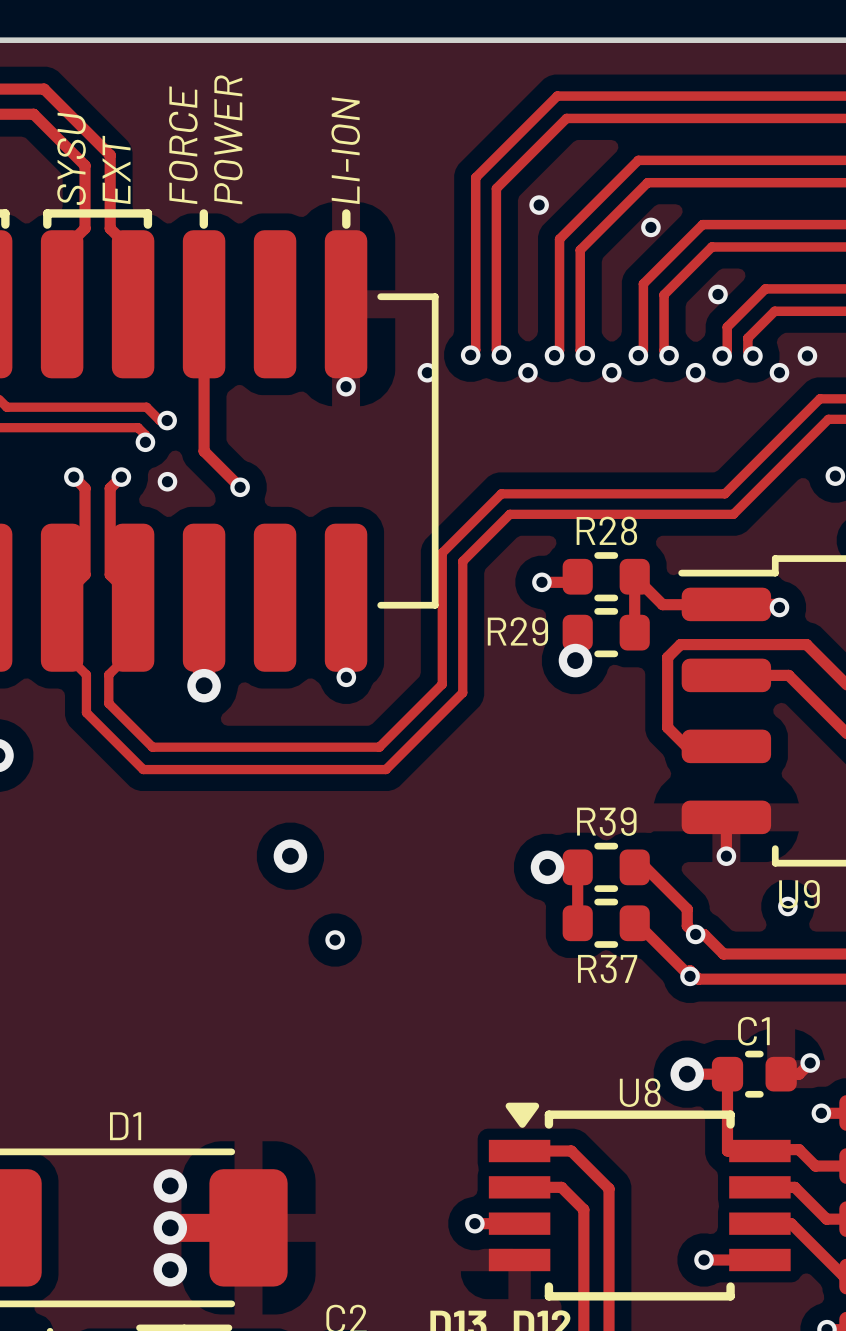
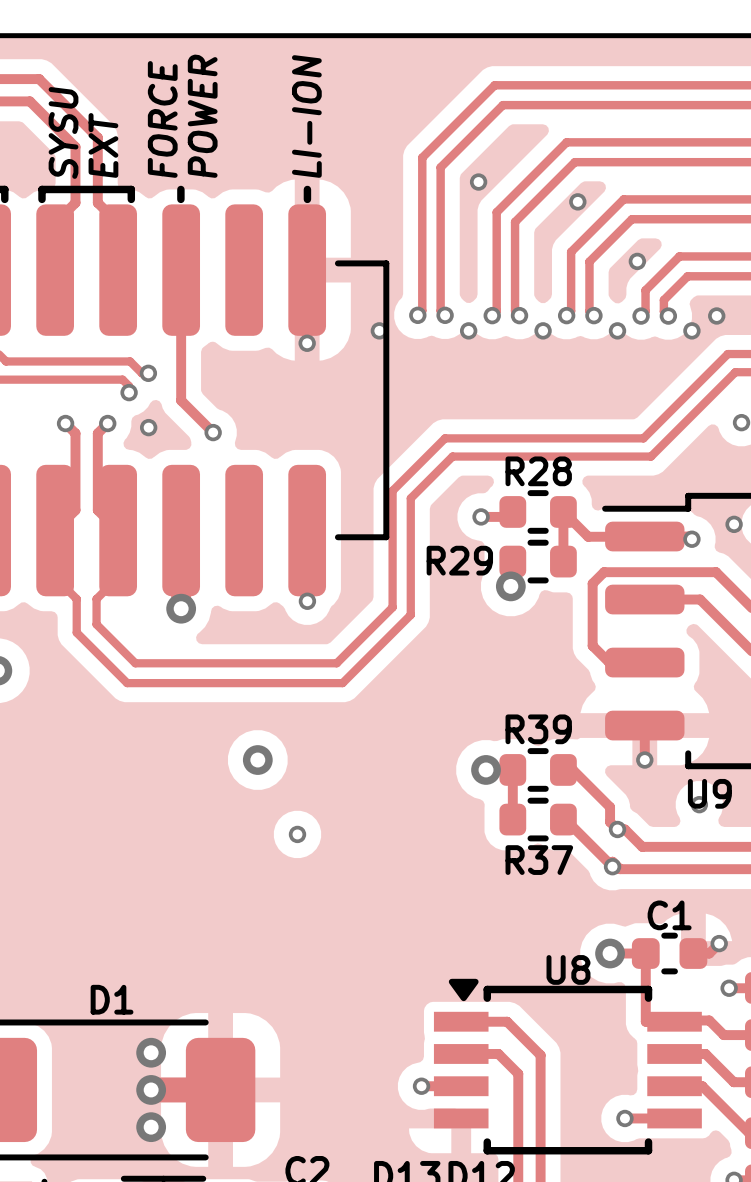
via: none -> (734, 524)

